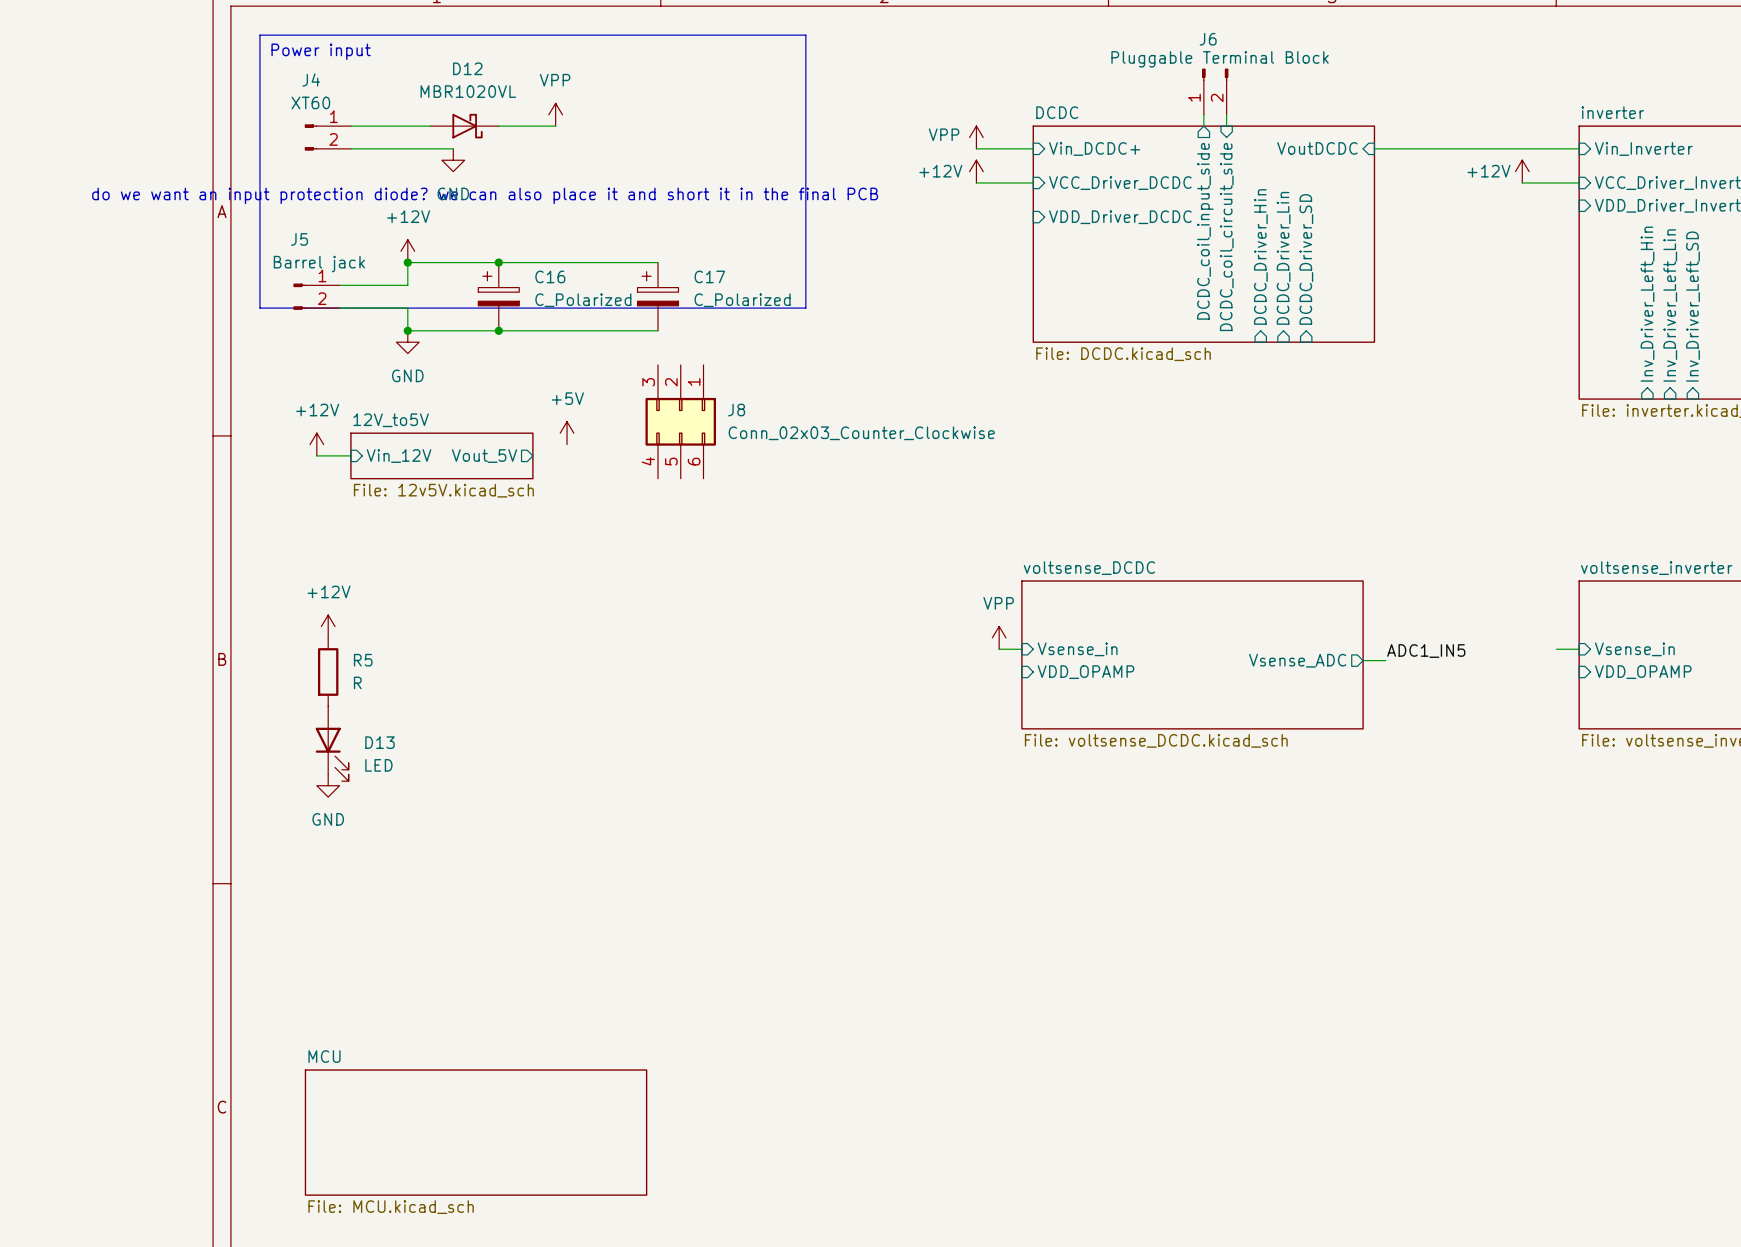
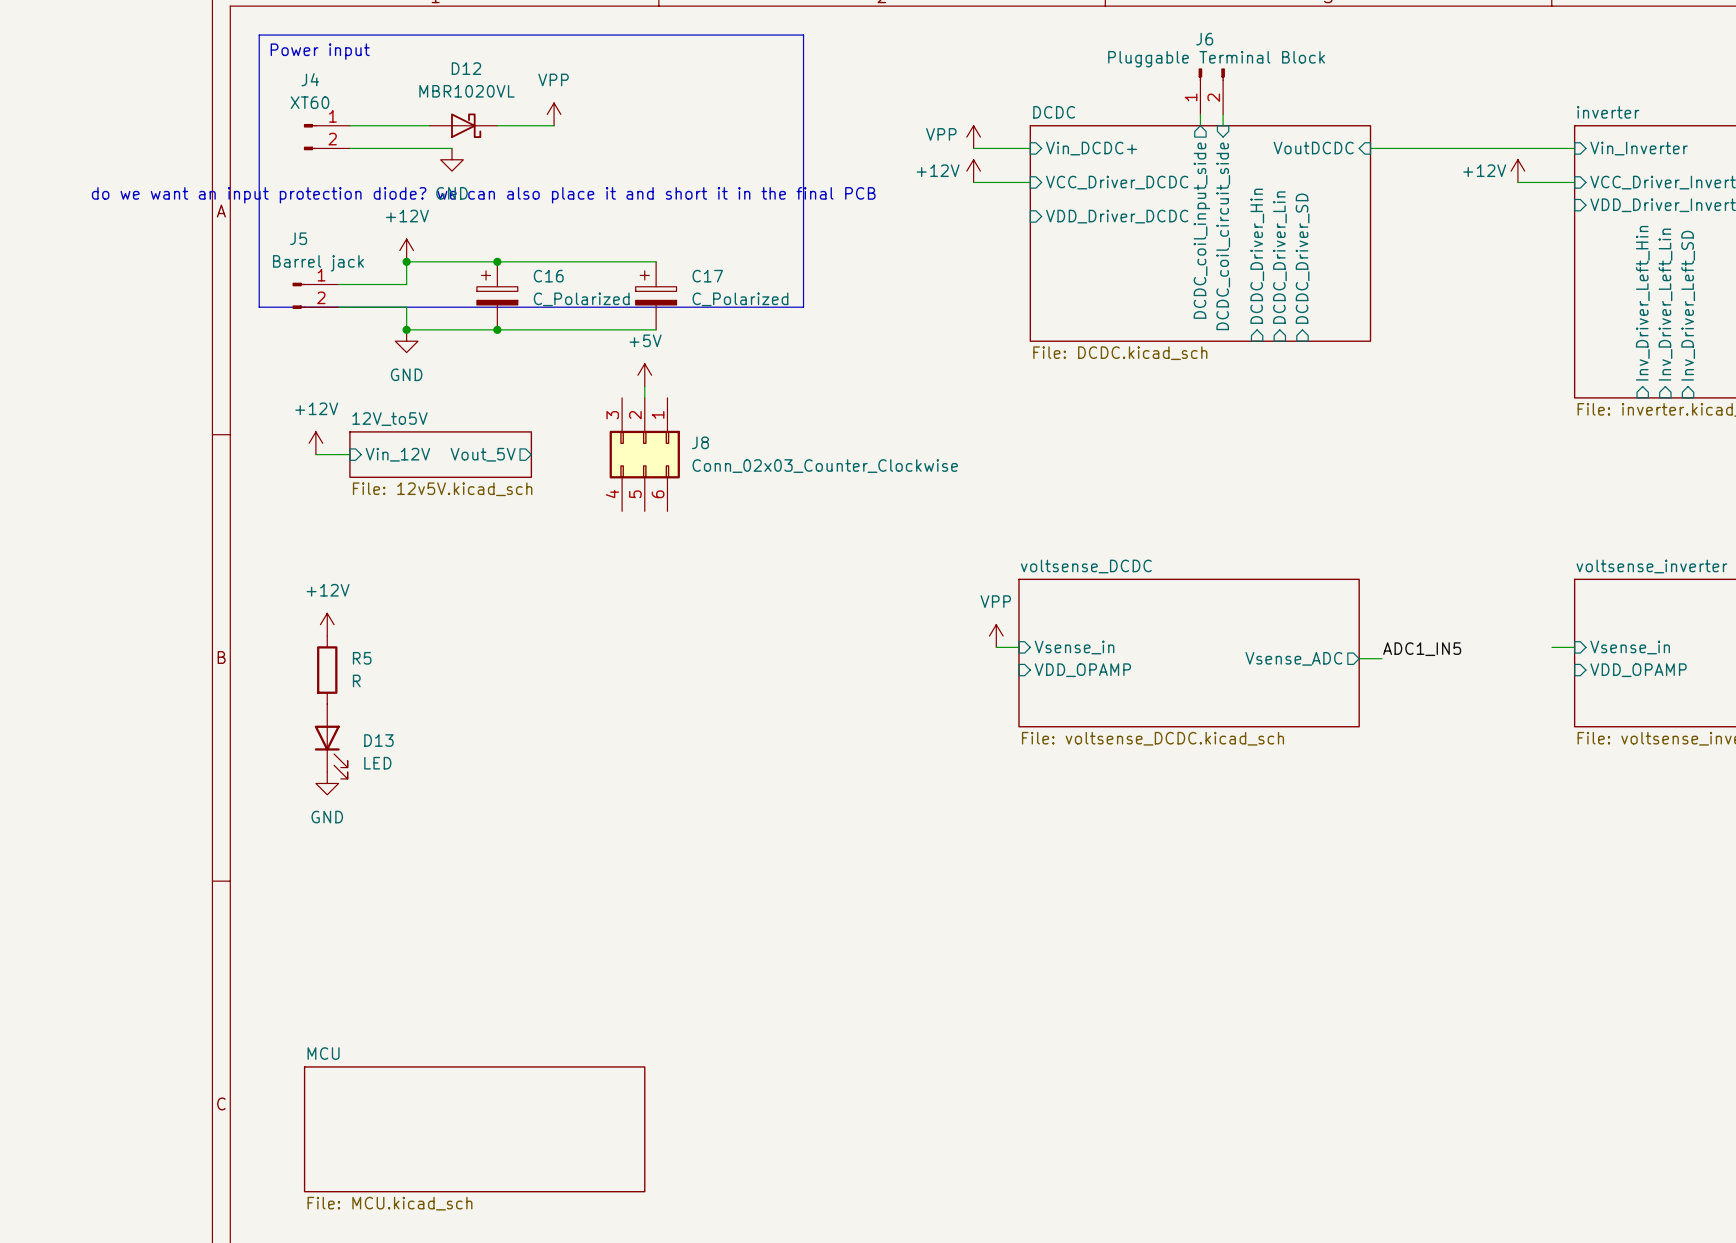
wire: none -> (644, 386) (644, 397)
J8 position: (680, 421) -> (644, 454)
power symbol position: +5V (567, 433) -> +5V (644, 375)

